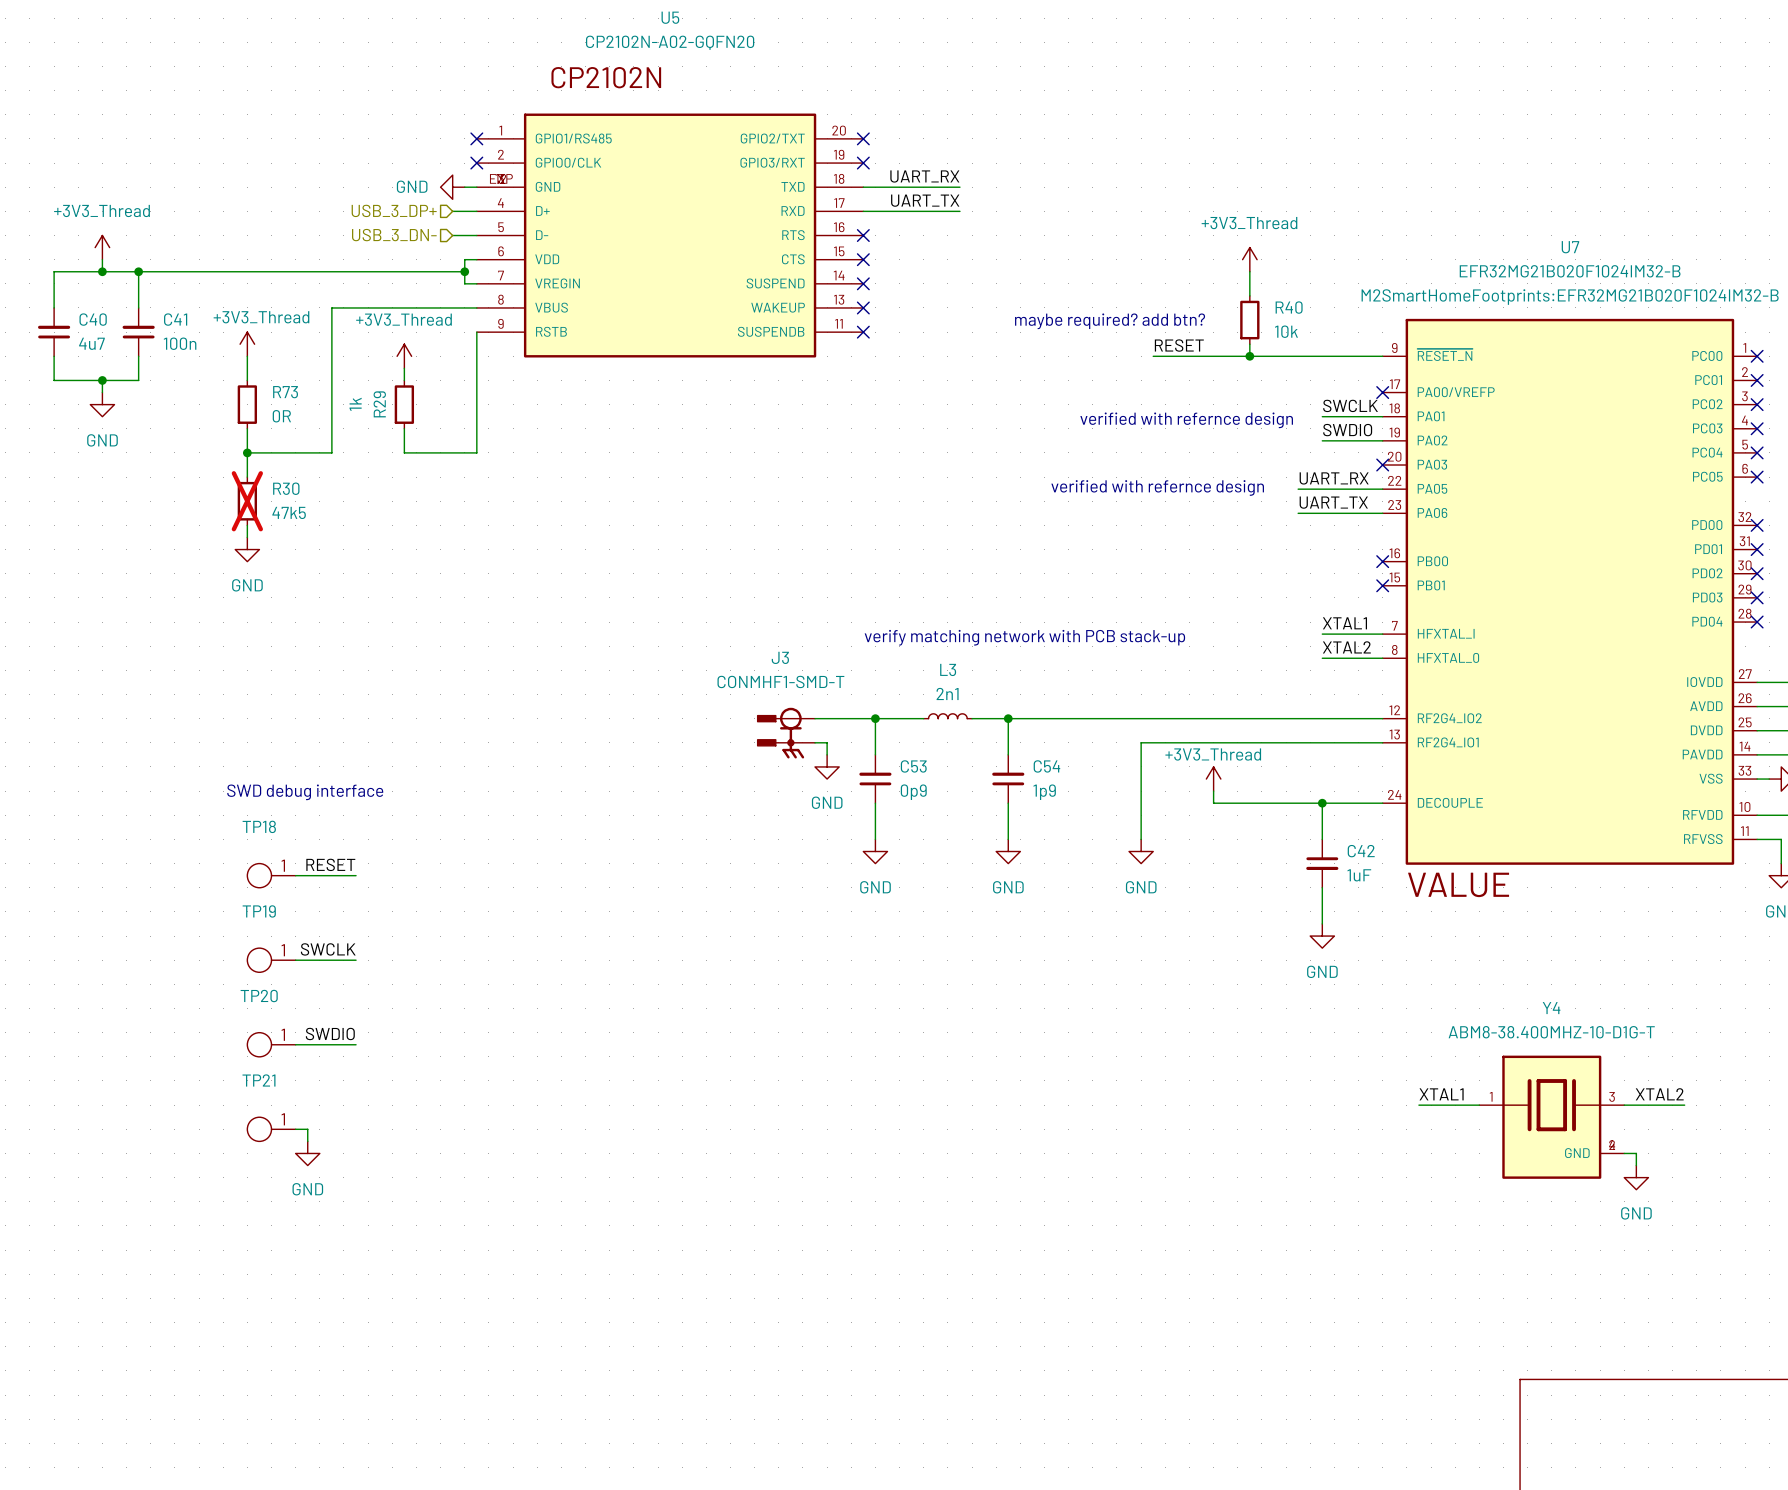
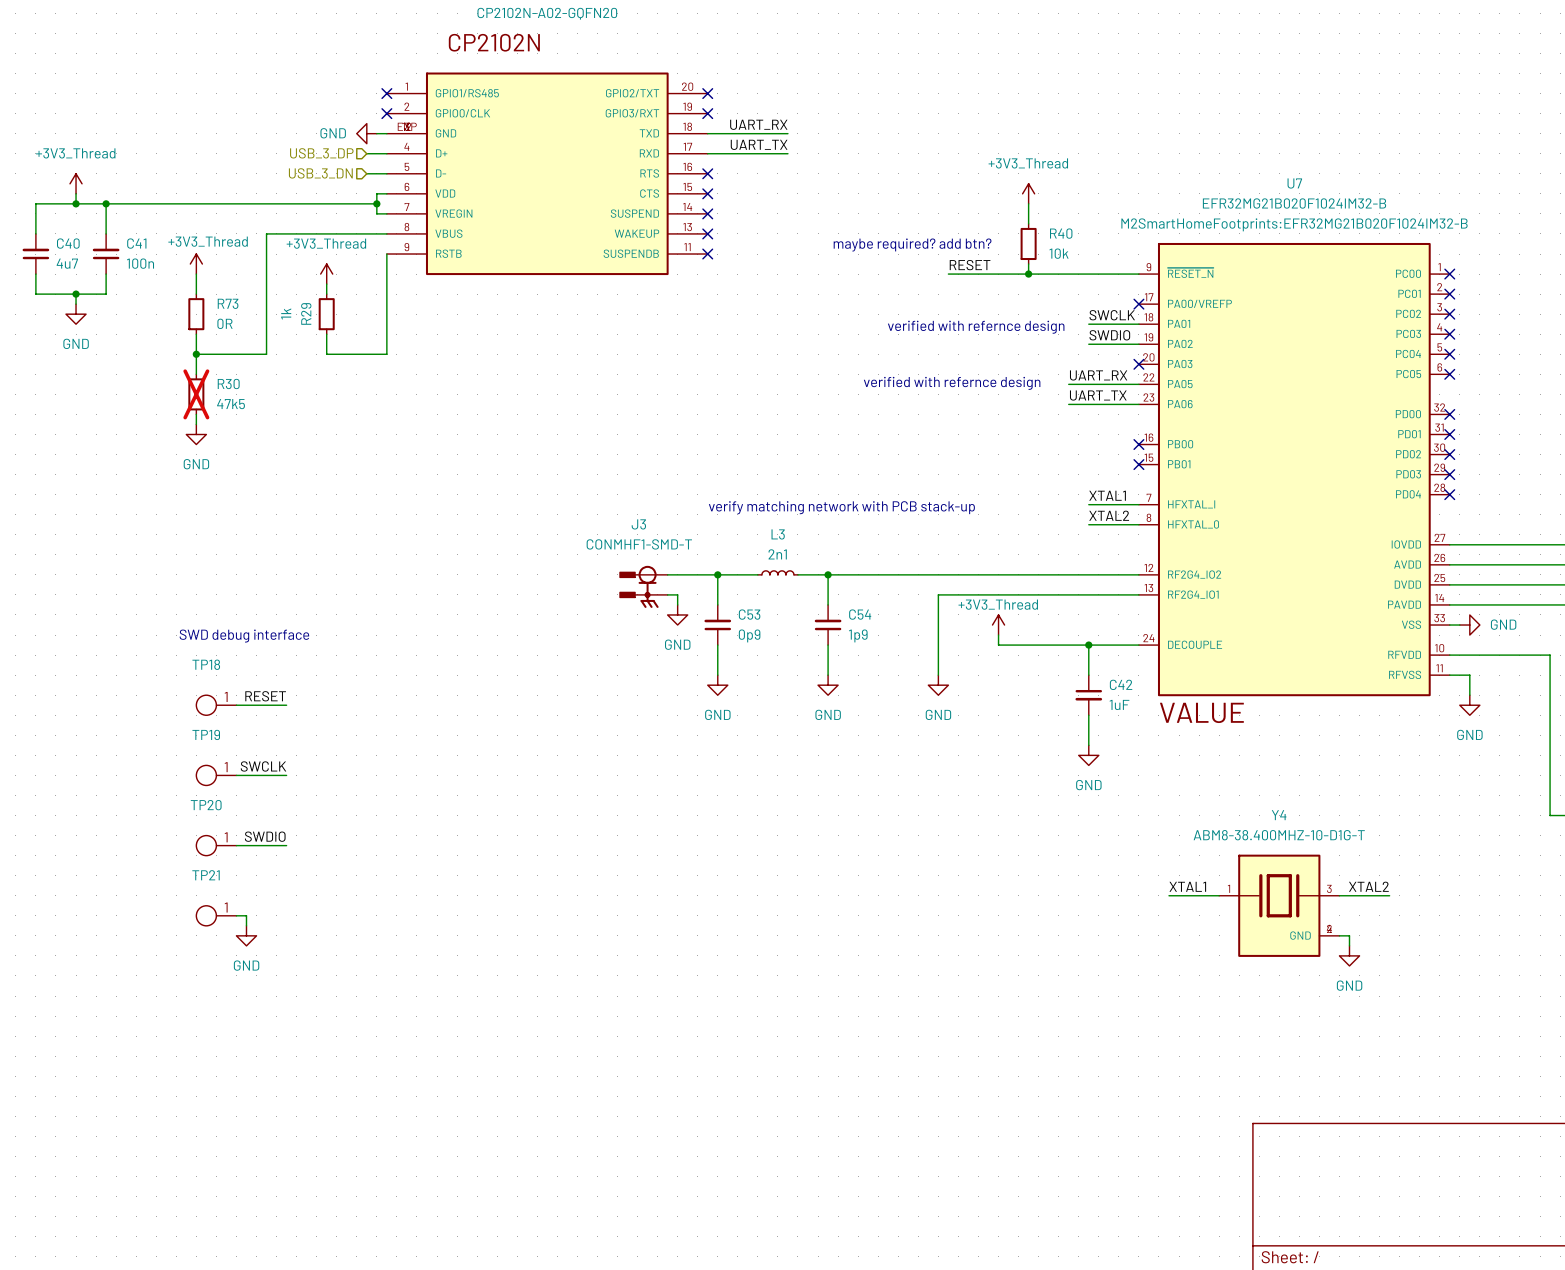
hierarchical label: USB_3_DP+ (394, 210) -> USB_3_DP (321, 153)
hierarchical label: USB_3_DN- (394, 235) -> USB_3_DN (320, 173)

